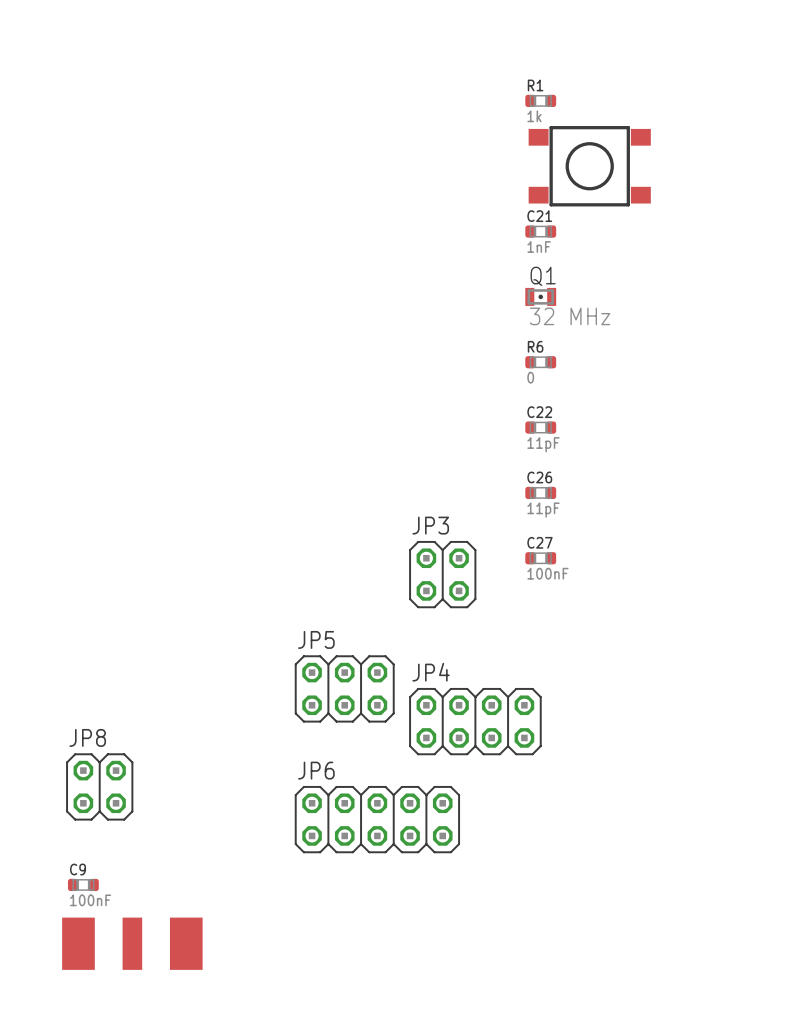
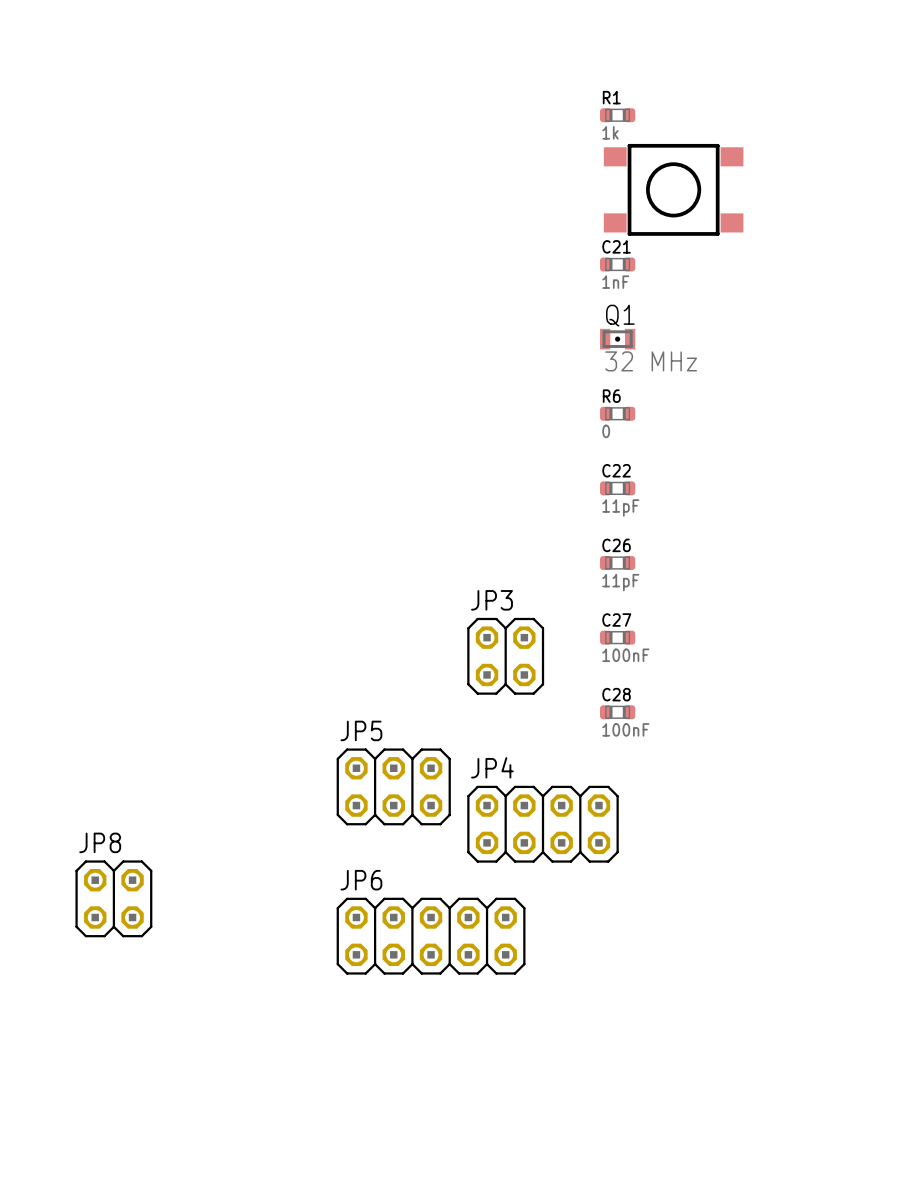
C28: none -> 100nF (617, 712)
C9: 100nF (83, 884) -> none
part: (132, 943) -> none

